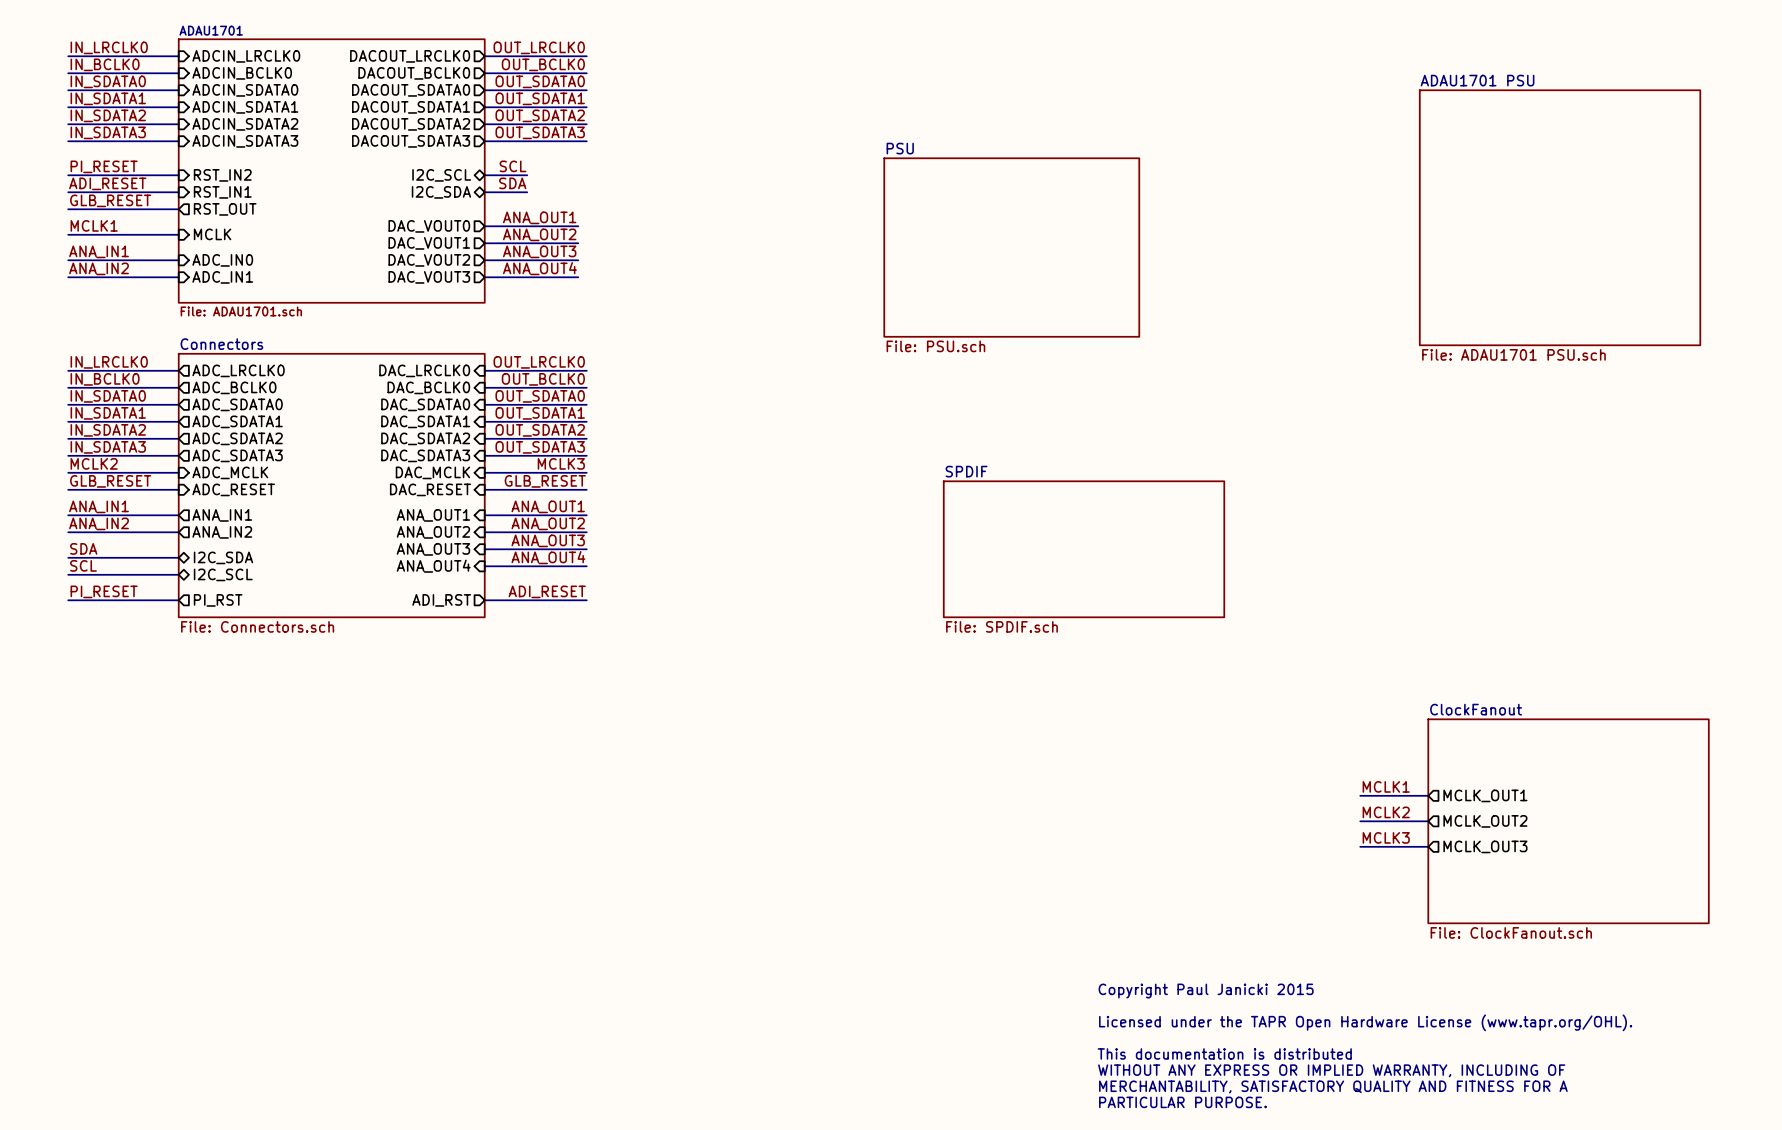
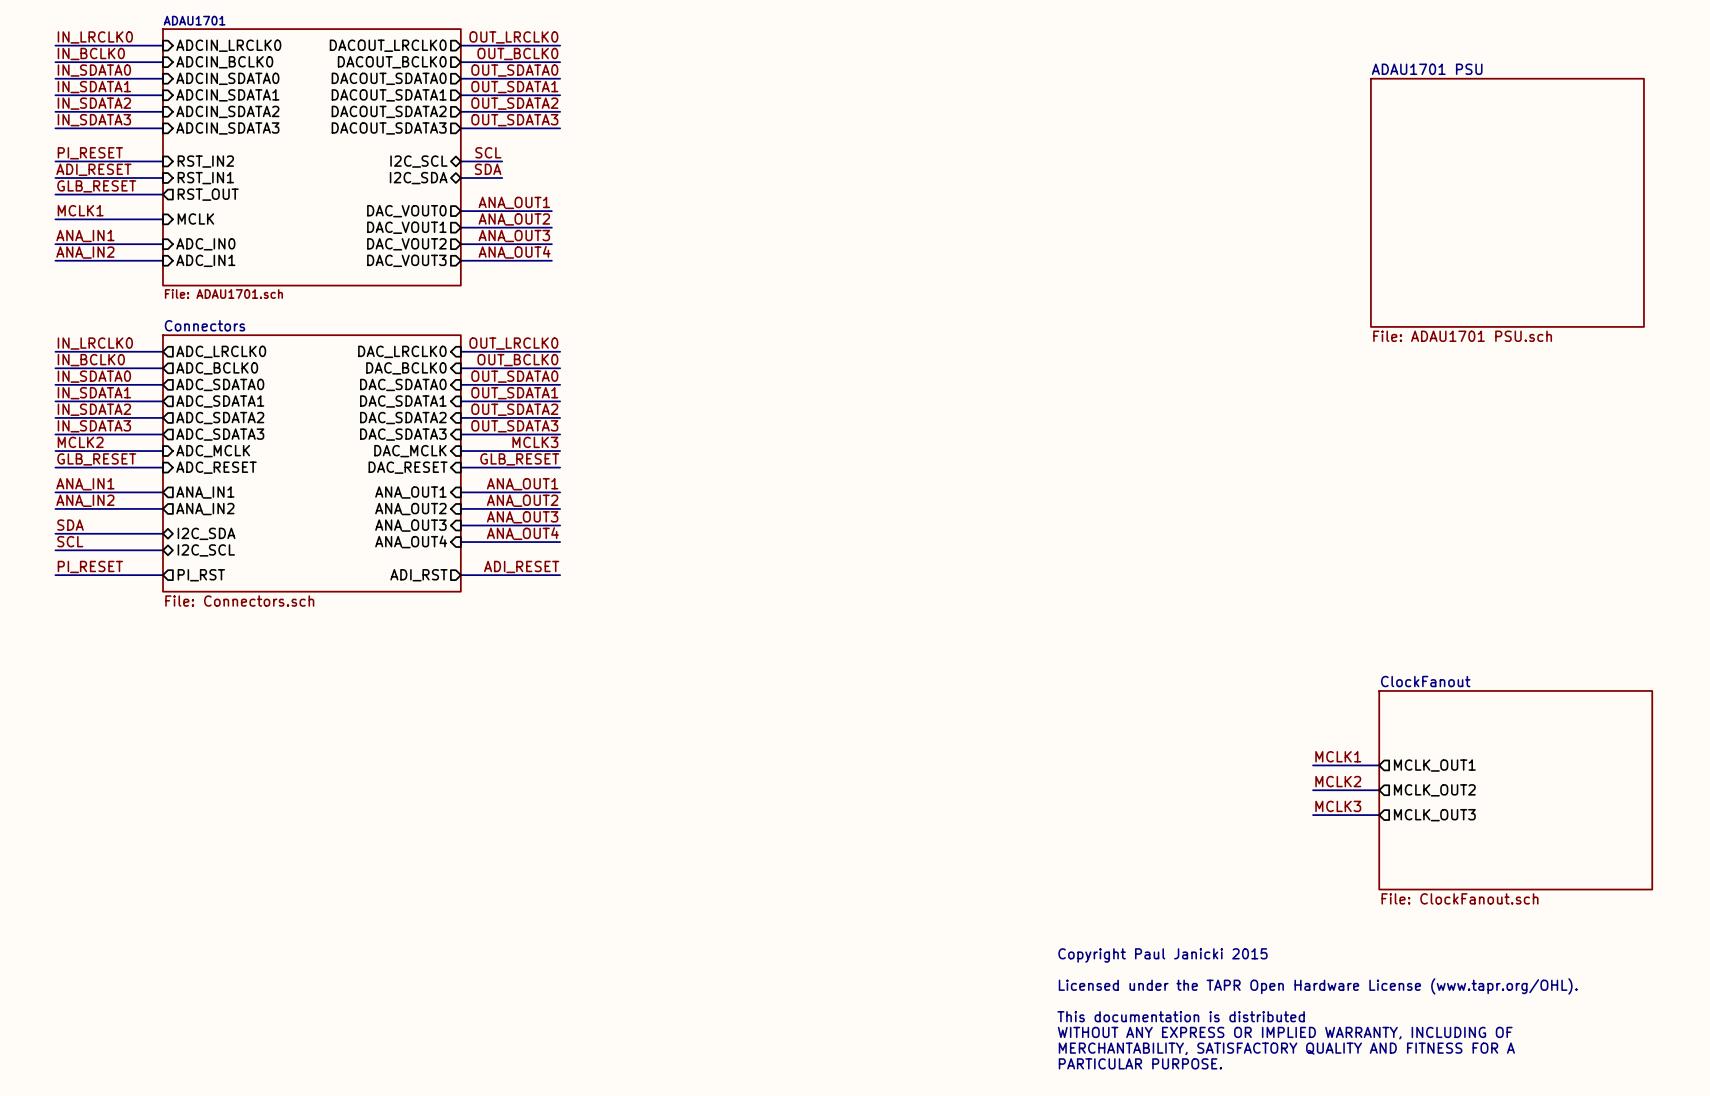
sheet PSU: File: PSU.sch (1011, 247) -> none
sheet SPDIF: File: SPDIF.sch (1084, 549) -> none

